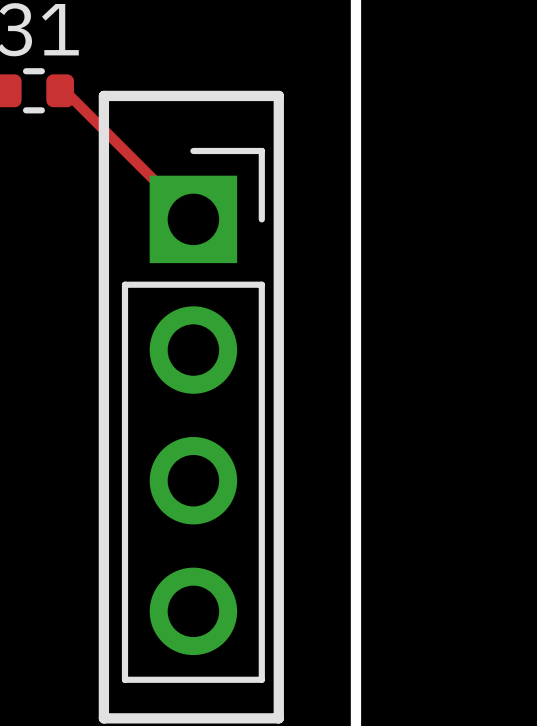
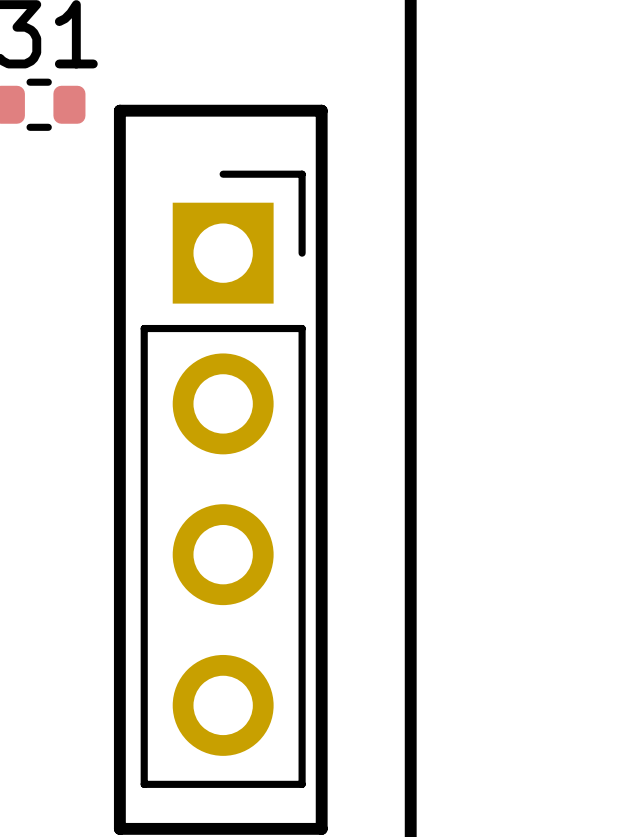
track: (60, 90) (64, 90) (193, 219) -> none

